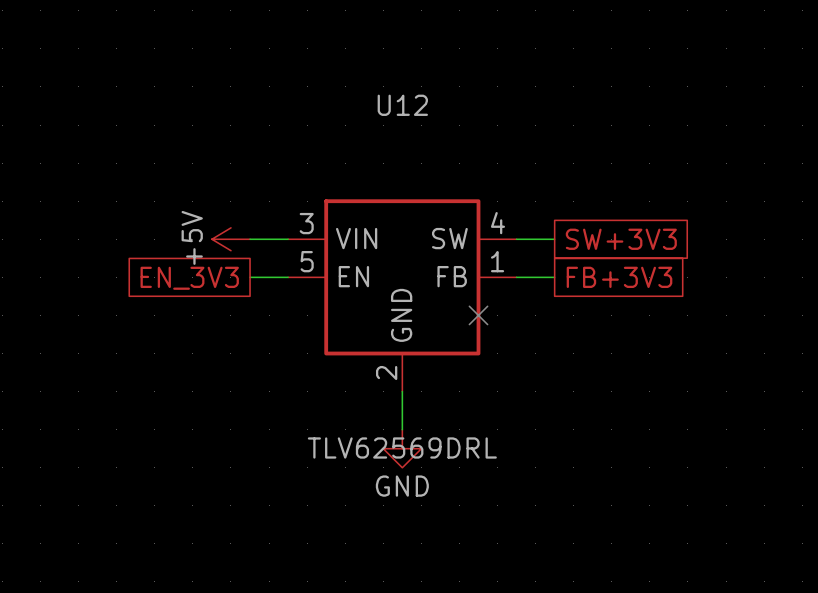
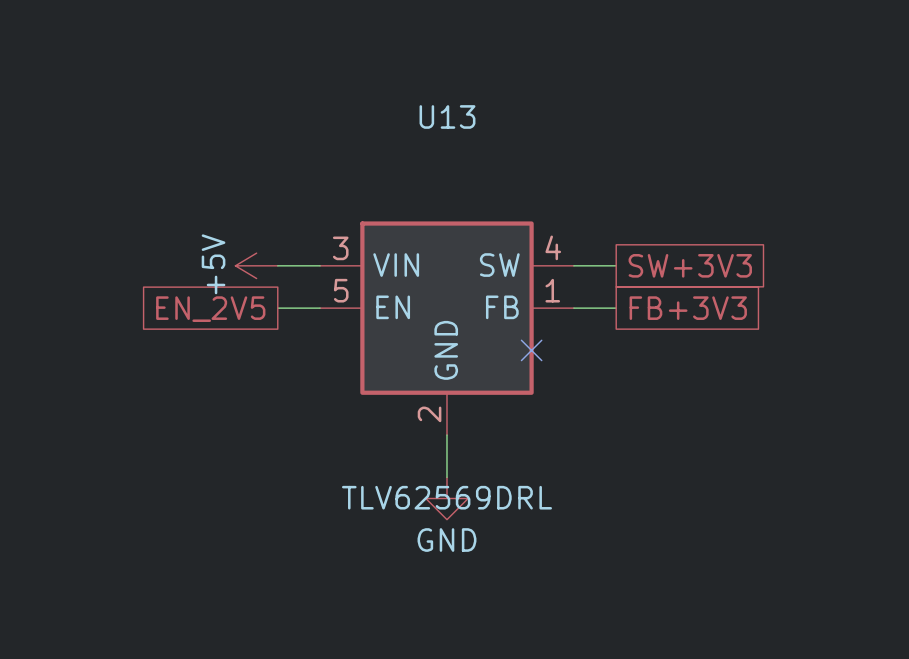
U12 name: U12 (402, 105) -> U13 (447, 116)
global label: EN_3V3 (189, 278) -> EN_2V5 (210, 309)

